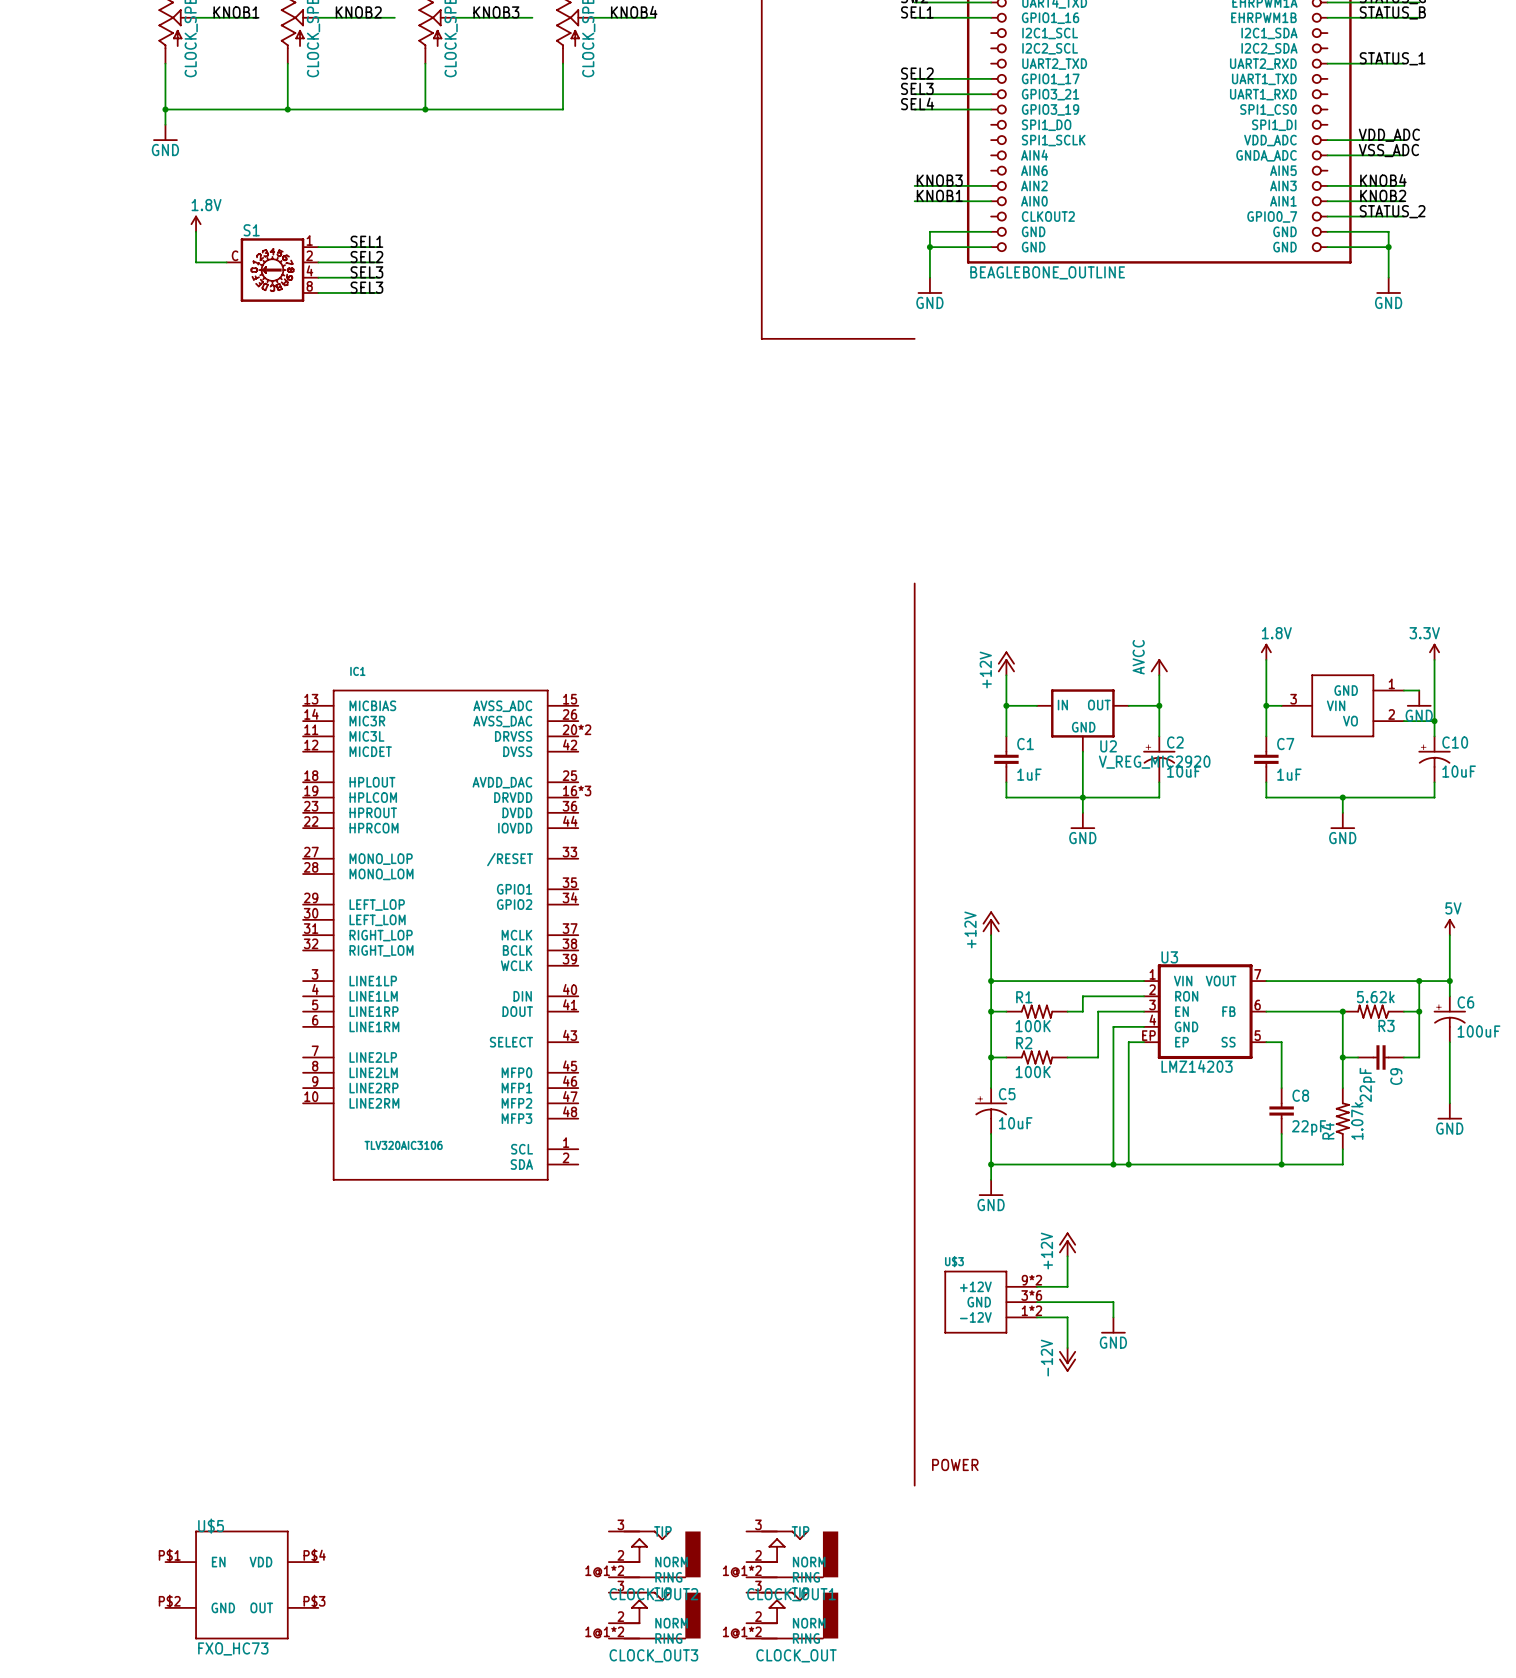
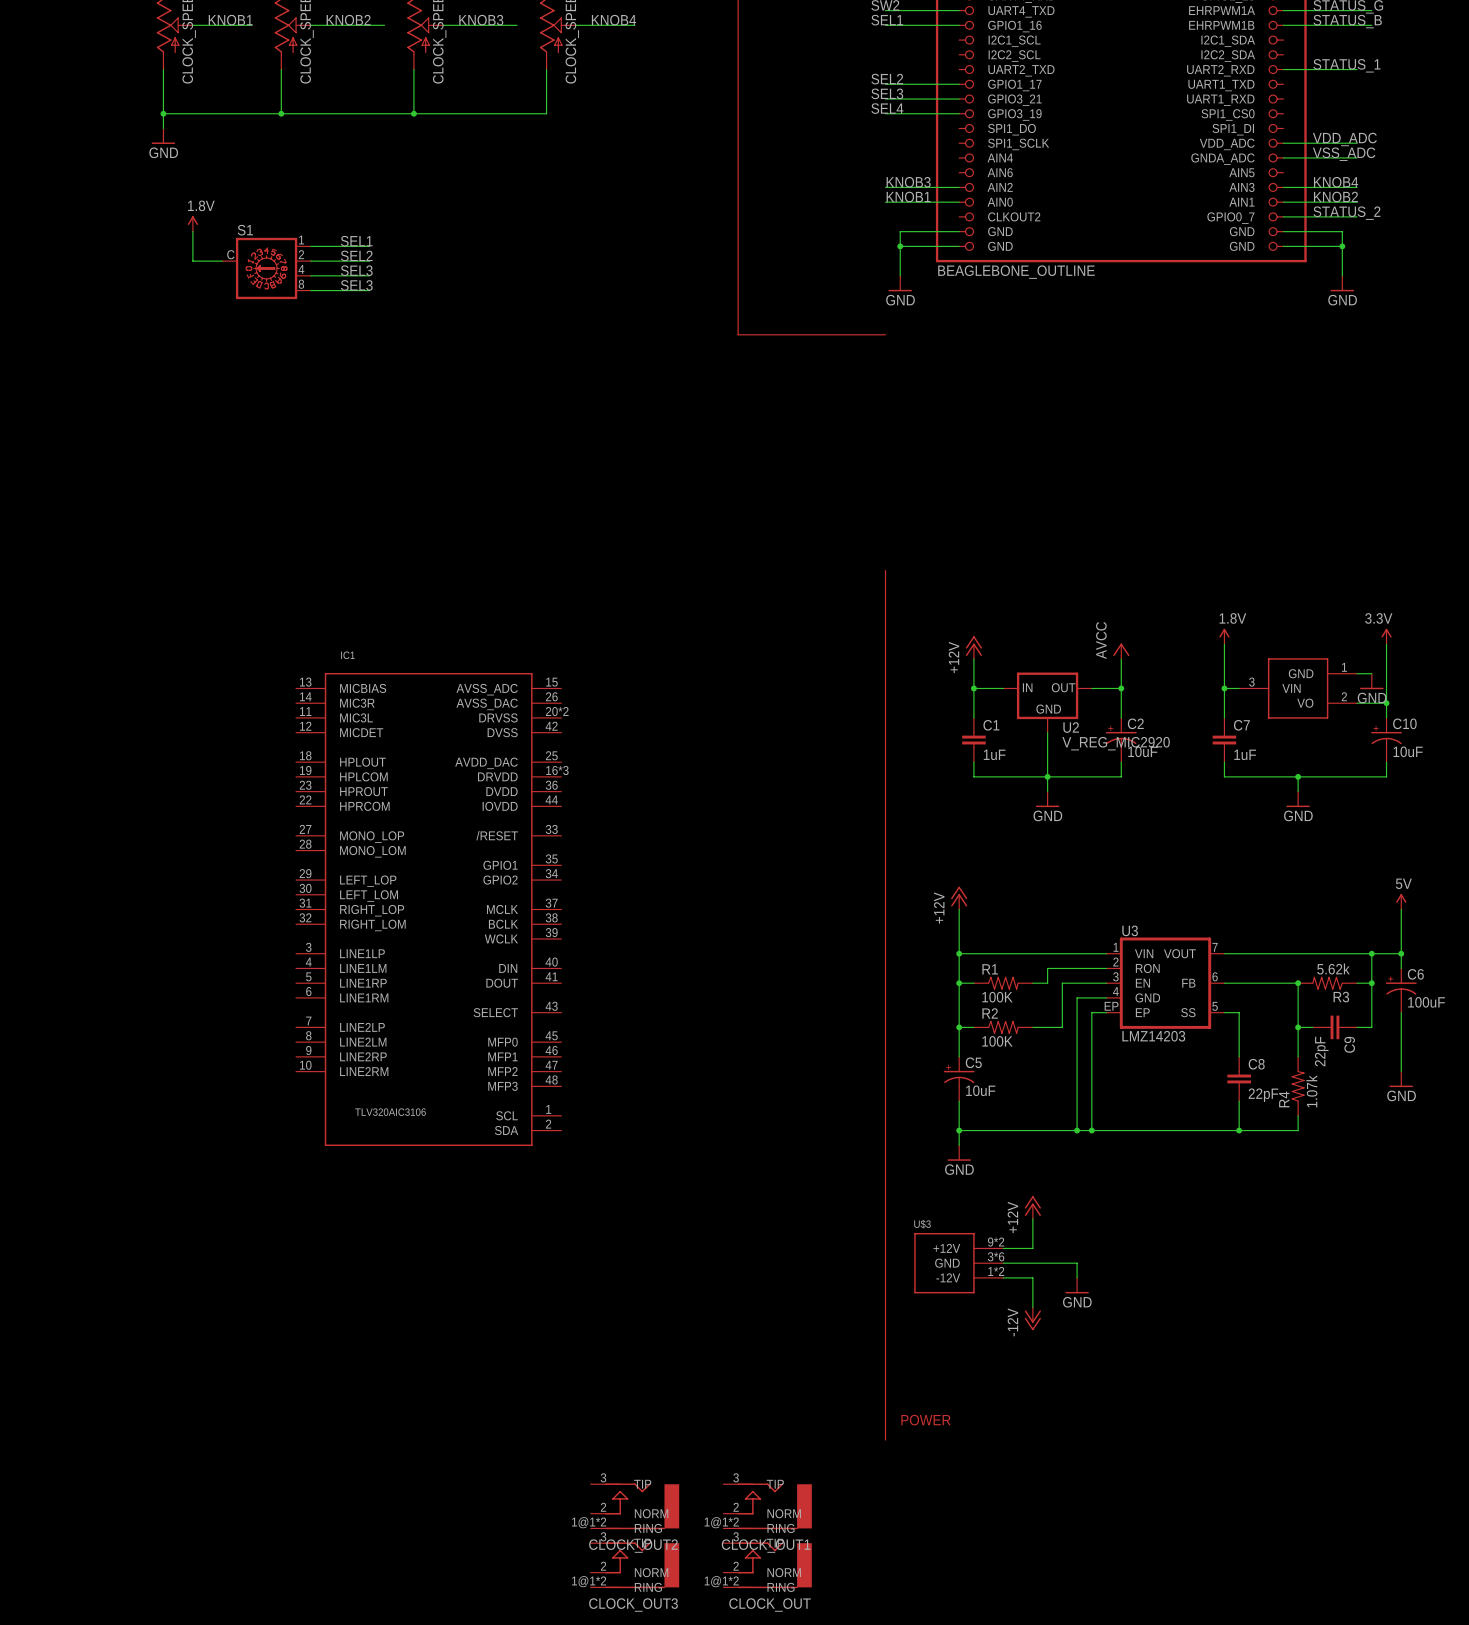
U$5: FXO_HC73 (241, 1584) -> none

